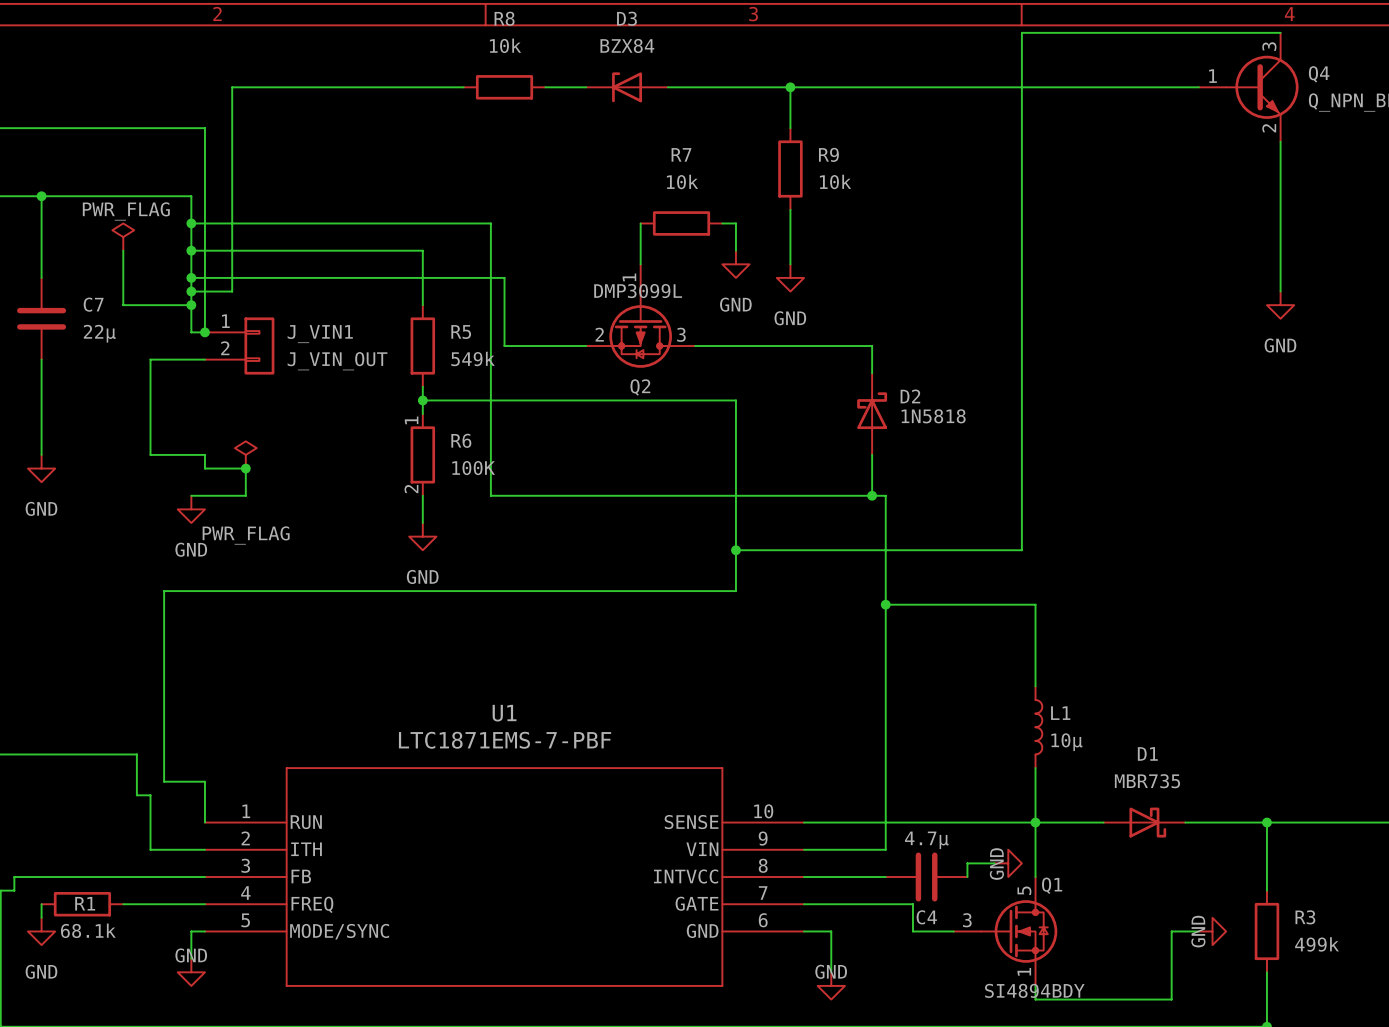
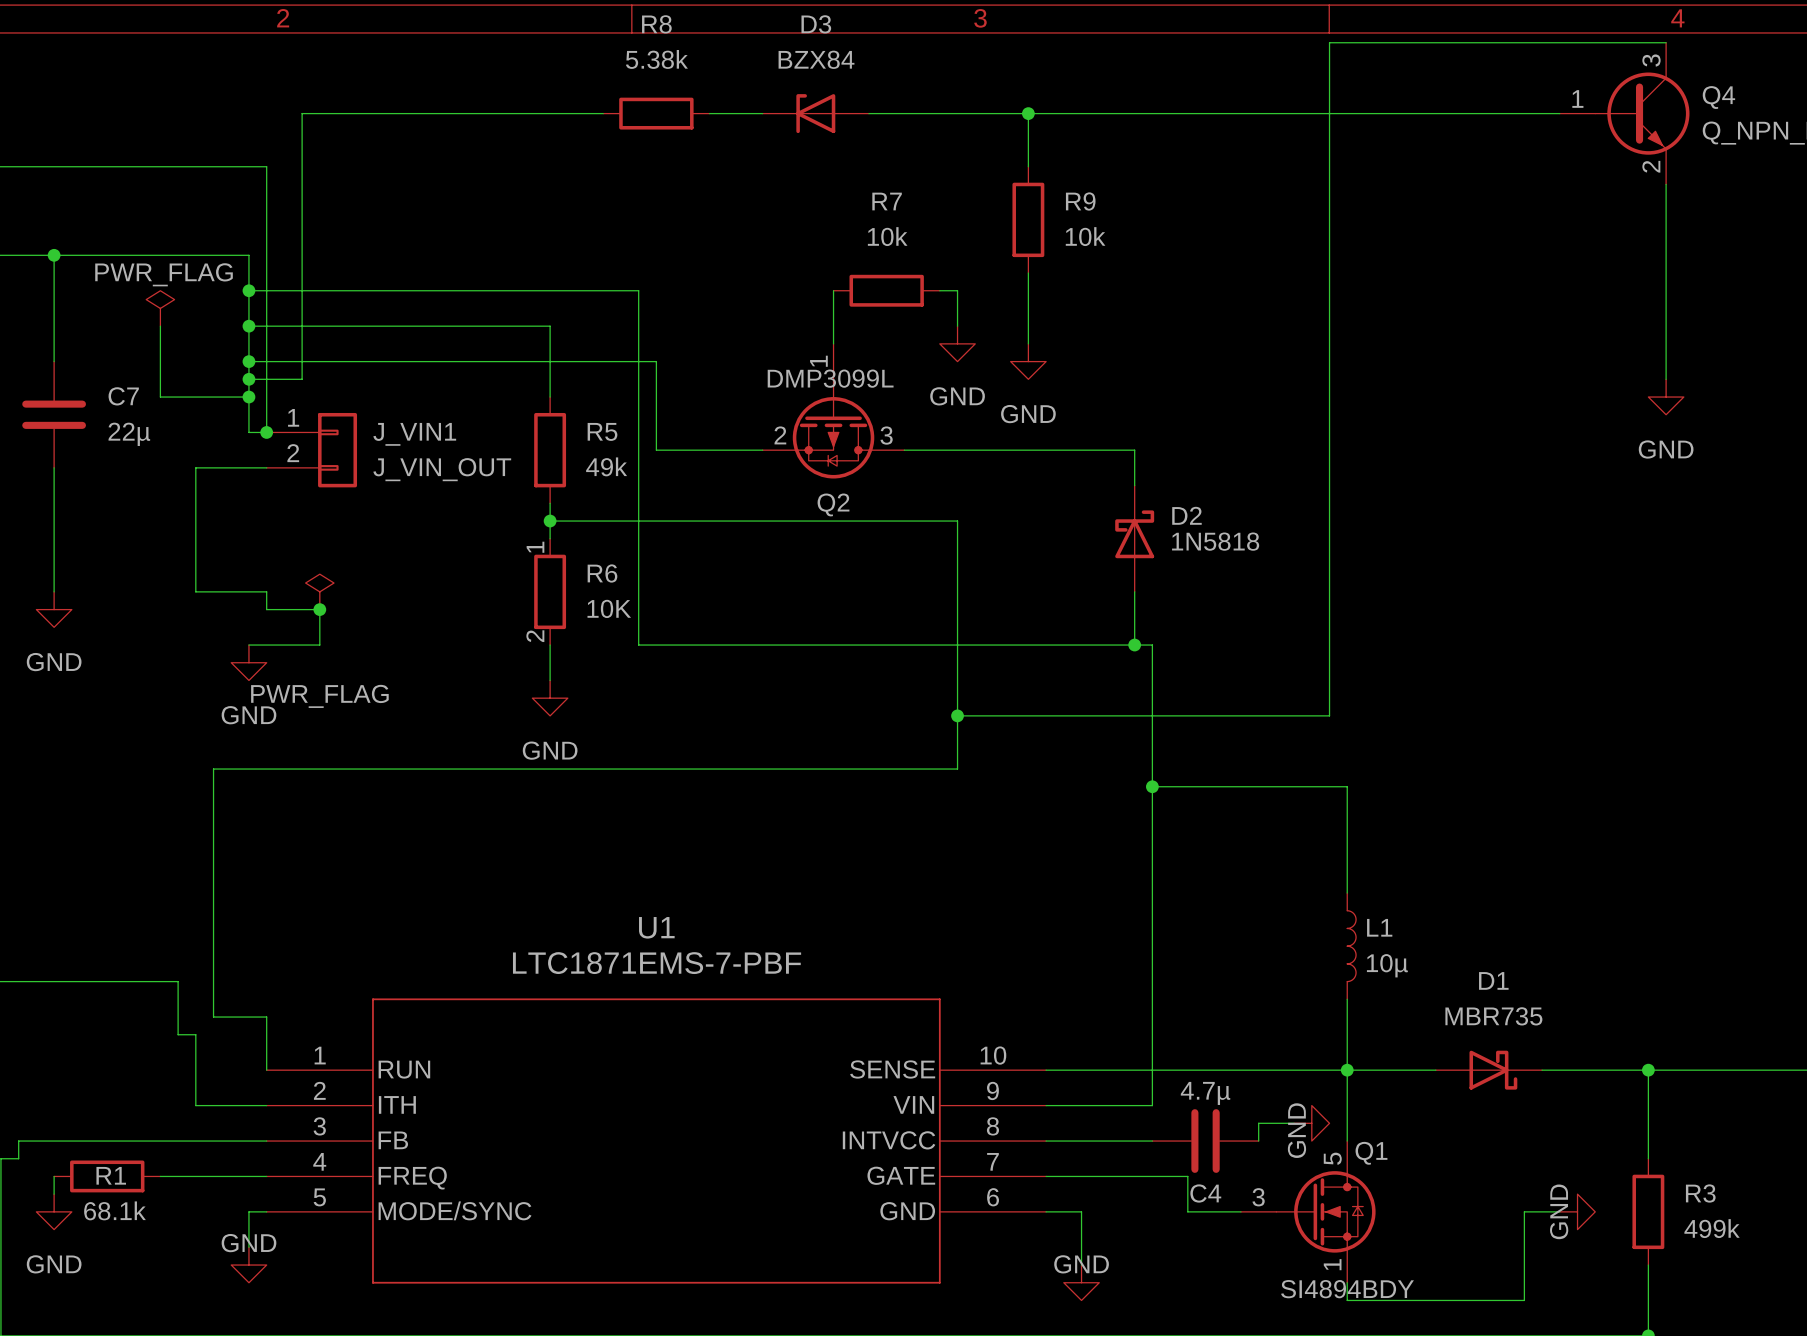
R8 value: 10k (505, 45) -> 5.38k (656, 59)
R5 value: 549k (473, 358) -> 49k (606, 466)
R6 value: 100K (473, 468) -> 10K (609, 608)

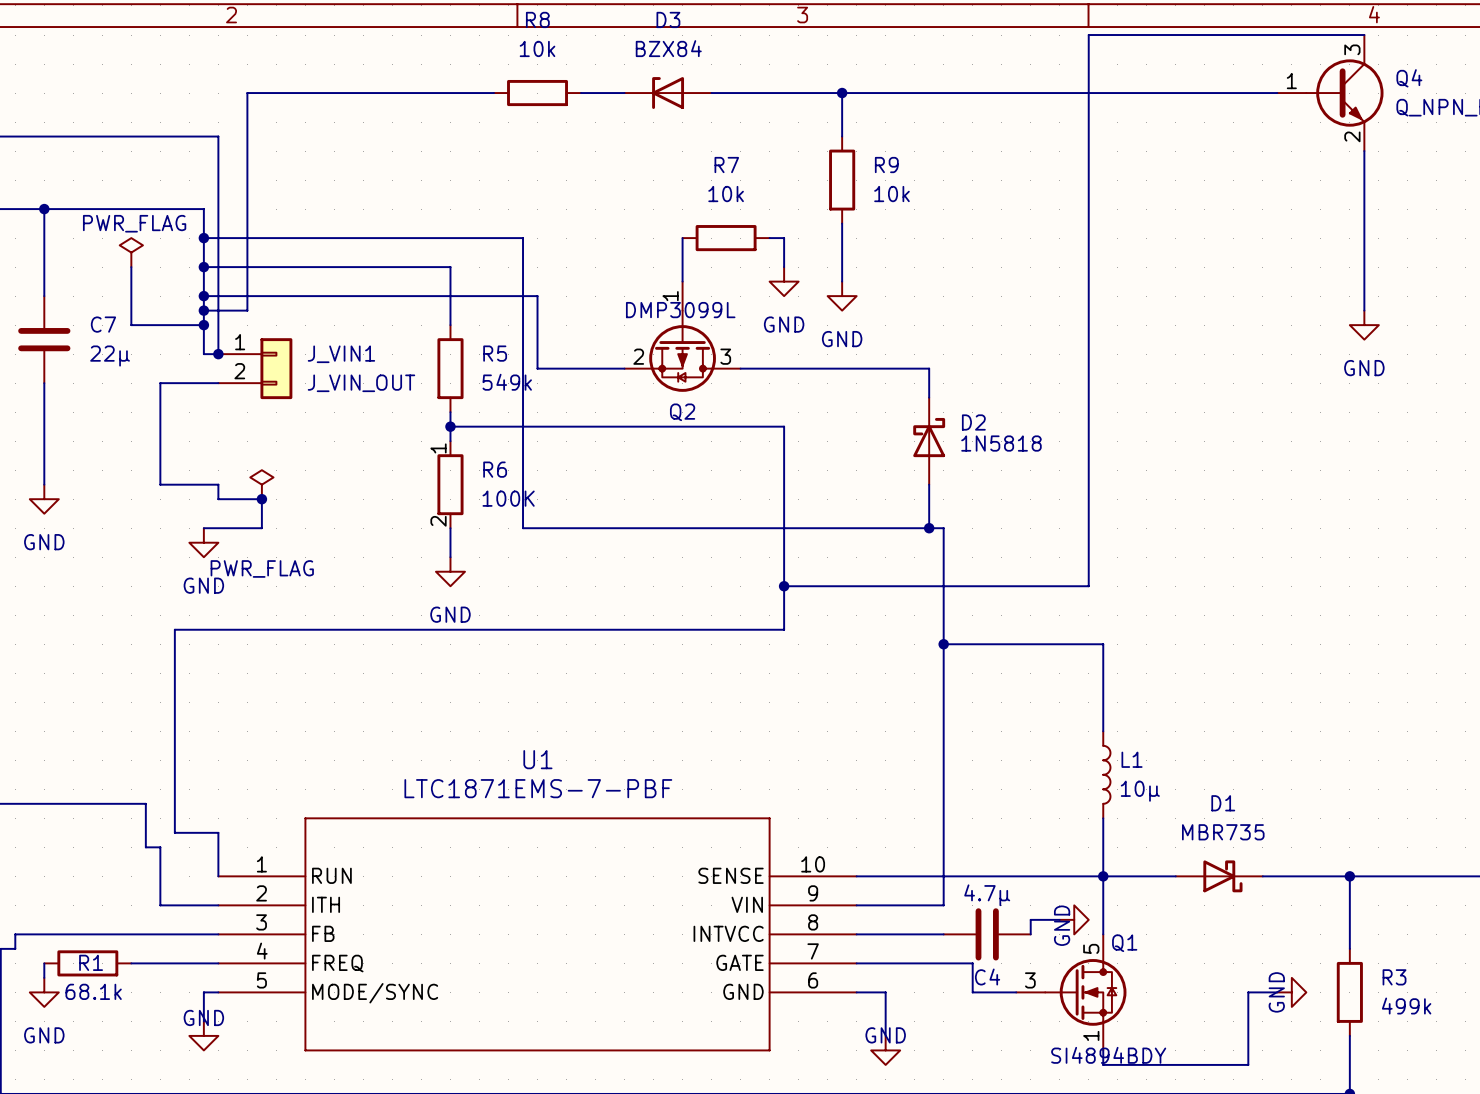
R8 value: 5.38k (656, 59) -> 10k (537, 48)
R5 value: 49k (606, 466) -> 549k (507, 382)
R6 value: 10K (609, 608) -> 100K (508, 498)

